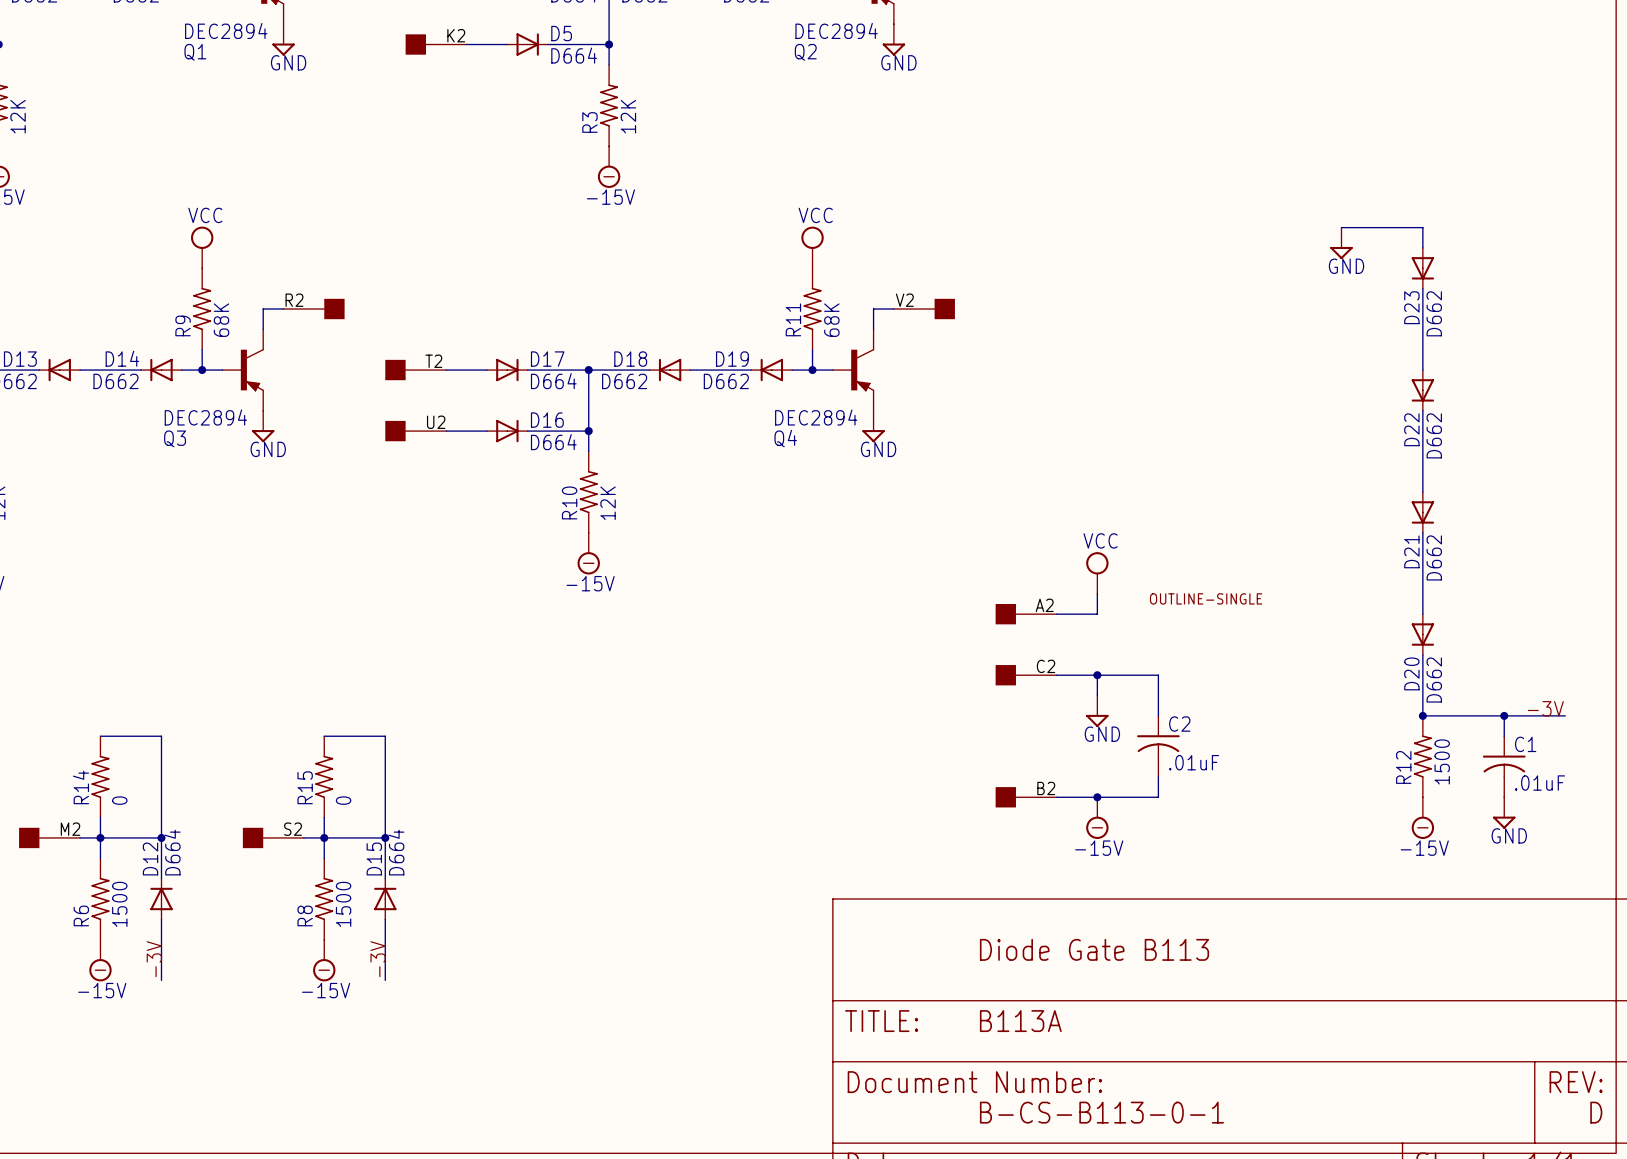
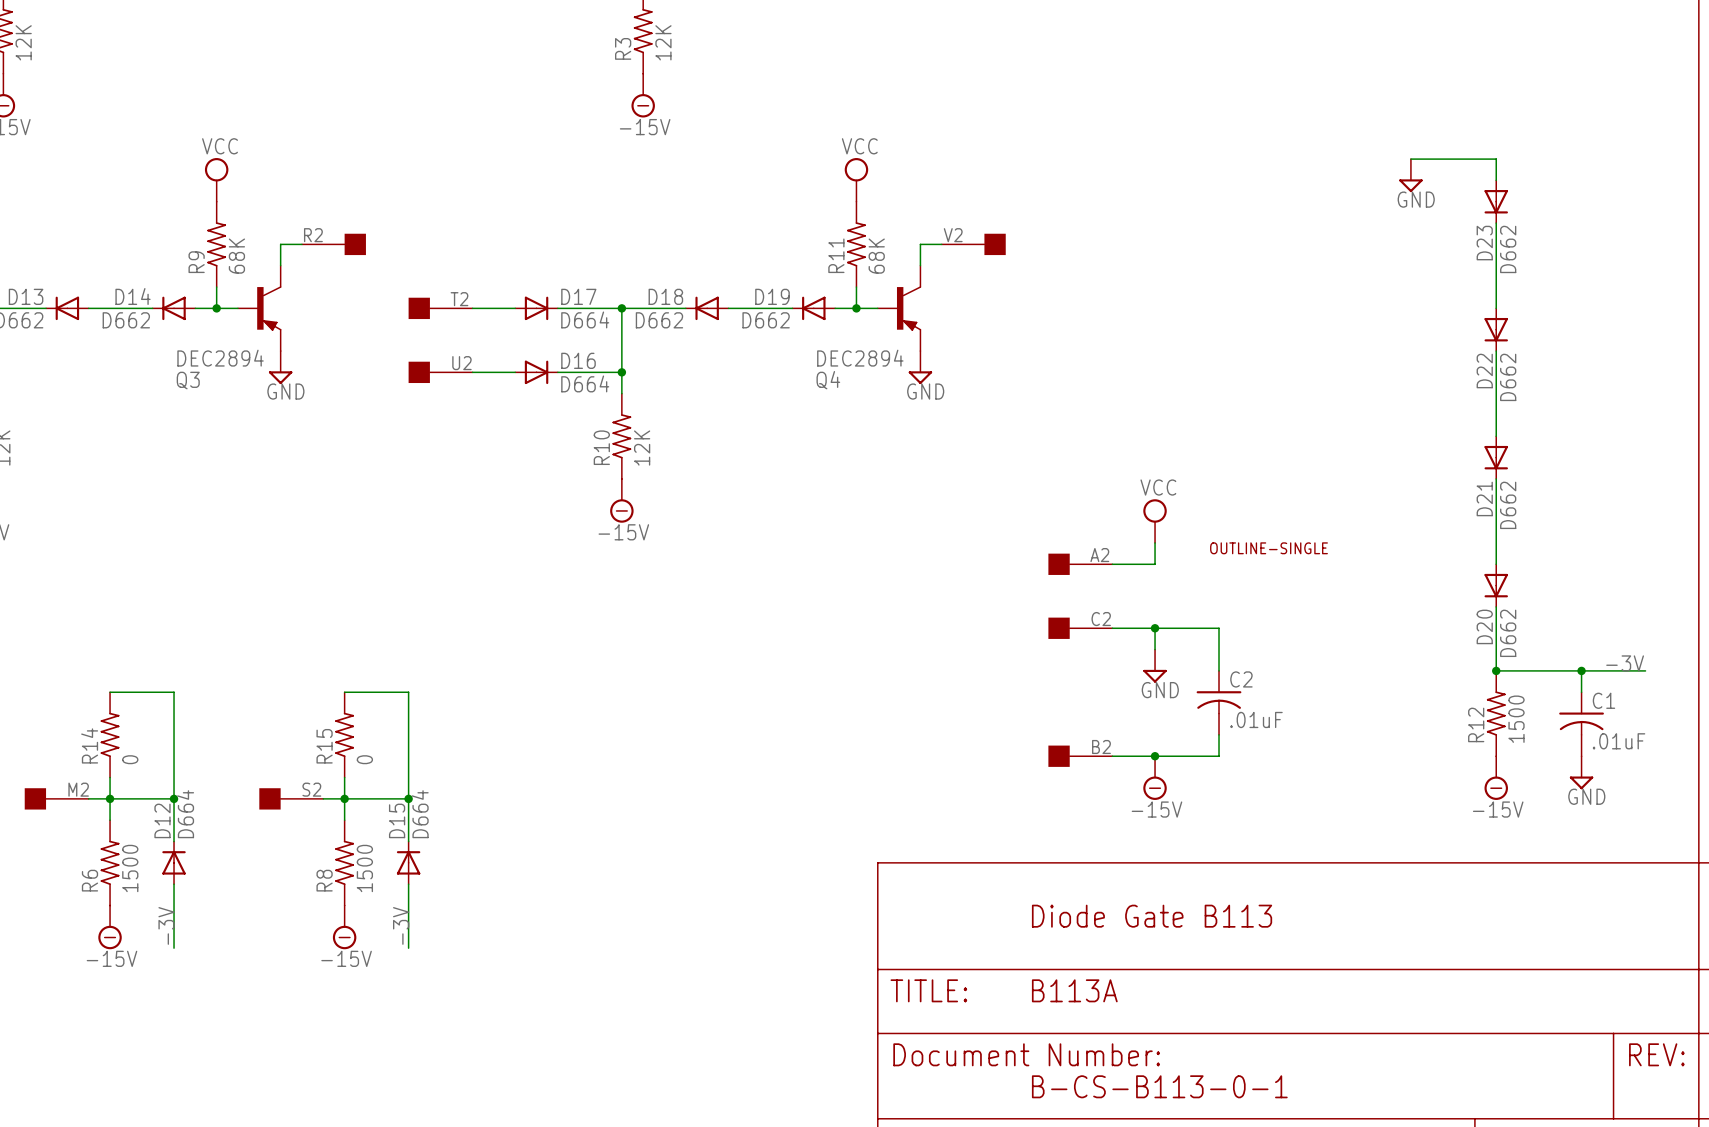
text: D (1596, 1112) -> none

